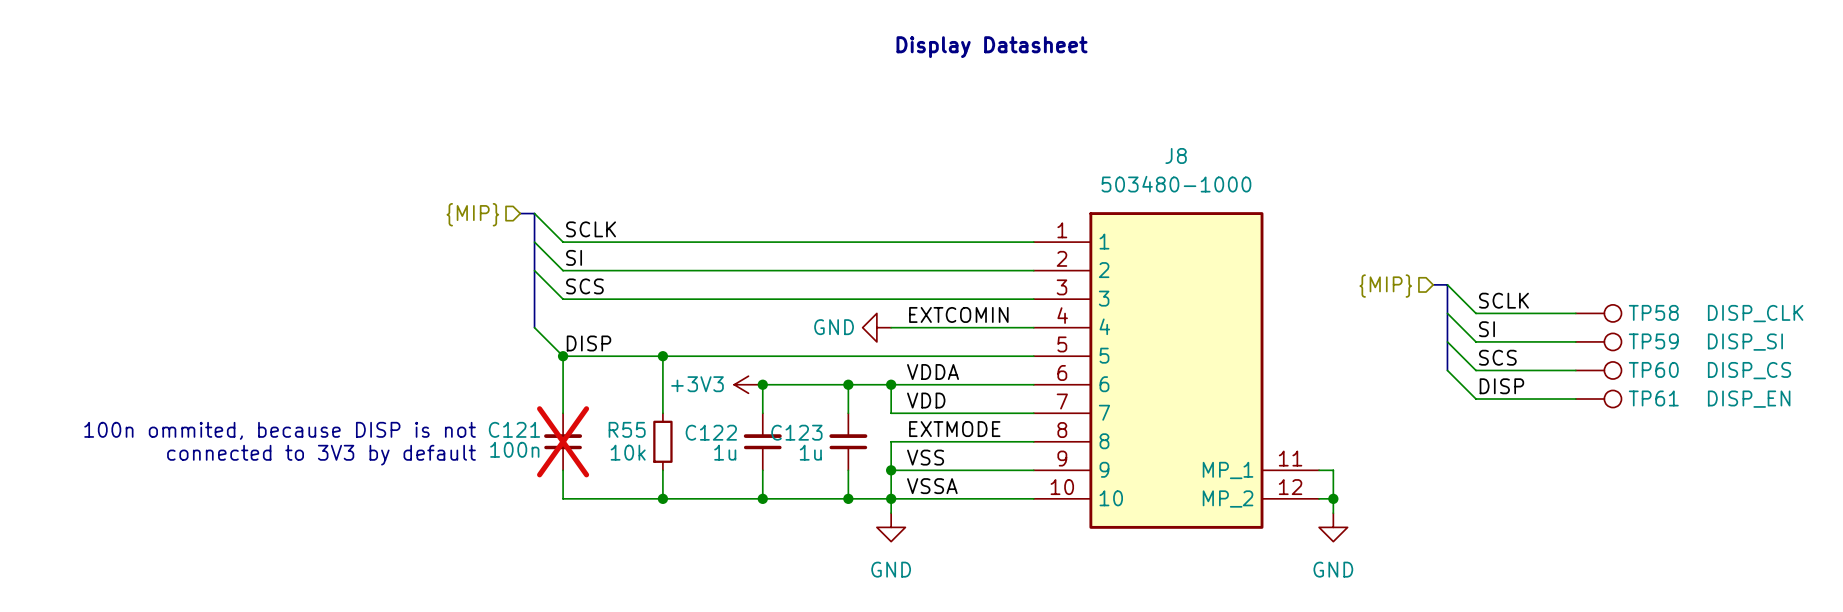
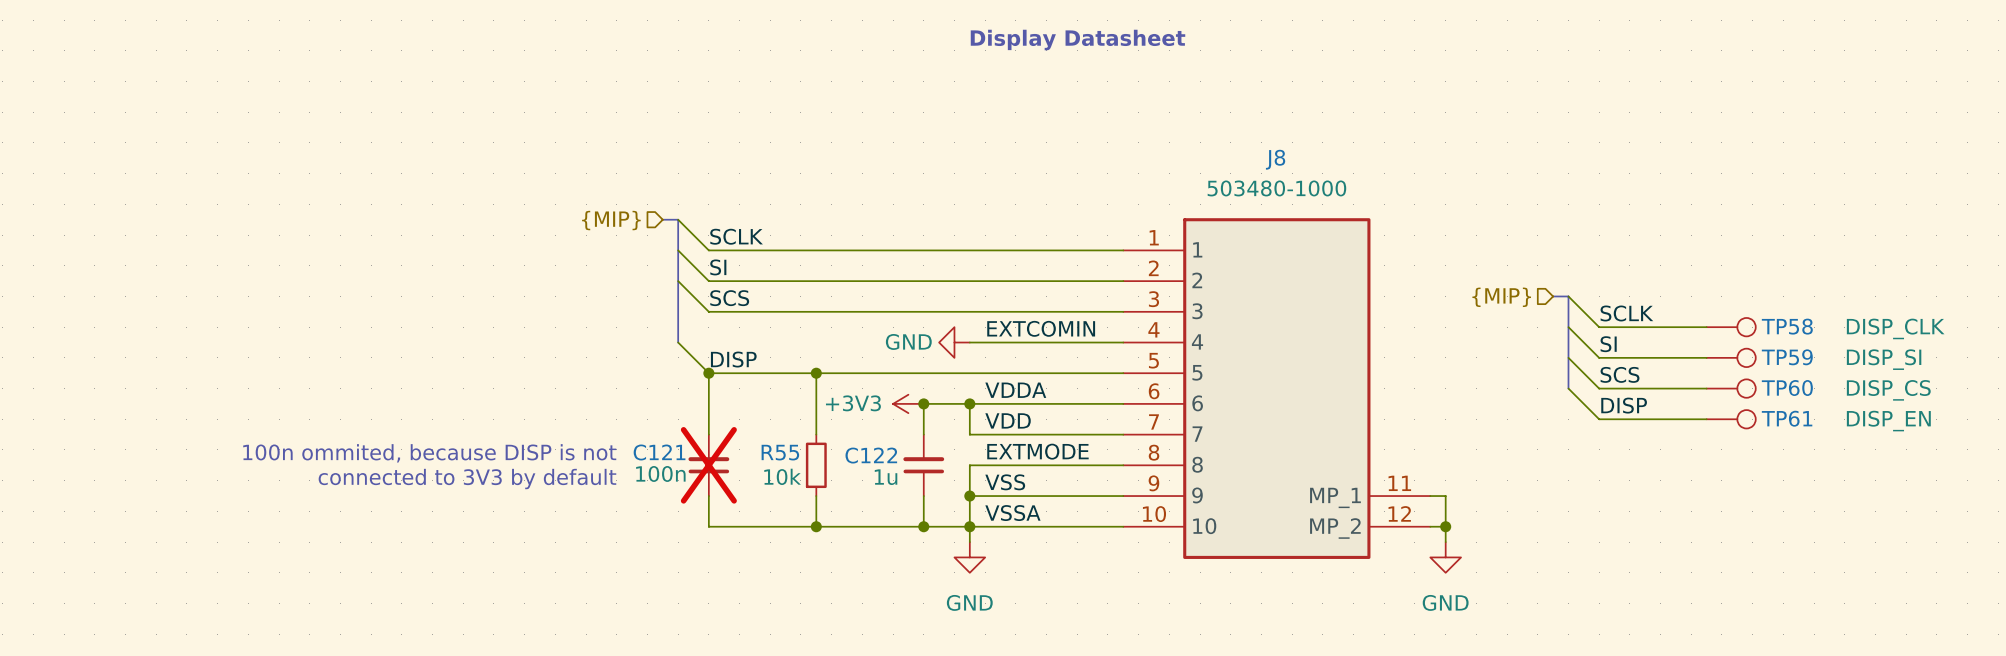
bus: (520, 213) (534, 213) (534, 327) -> (662, 219) (678, 219) (678, 342)
wire: (534, 213) (563, 242) (648, 242) -> (678, 219) (708, 250)
hierarchical label position: {MIP} (472, 214) -> {MIP} (611, 220)
label position: SCLK (591, 229) -> SCLK (736, 236)
wire: (534, 242) (563, 270) (648, 270) -> (678, 250) (708, 281)
label position: SI (574, 257) -> SI (718, 267)
wire: (534, 270) (563, 299) (648, 299) -> (678, 281) (708, 311)
label position: SCS (584, 286) -> SCS (729, 298)
wire: (534, 327) (563, 356) -> none
wire: none -> (678, 342) (708, 373) (708, 434)
label position: DISP (588, 343) -> DISP (733, 359)
wire: (563, 356) (648, 356) -> none
wire: (563, 356) (563, 413) -> none
junction: (563, 356) -> none
wire: (662, 356) (662, 413) -> (816, 373) (816, 434)
junction position: (662, 356) -> (708, 373)
power symbol position: +3V3 (748, 384) -> +3V3 (908, 403)
junction position: (762, 384) -> (816, 373)
wire: (848, 384) (762, 384) (762, 413) -> none
text position: 100n ommited, because DISP is not (280, 430) -> 100n ommited, because DISP is not (429, 453)
C123 name: C123 (796, 432) -> C122 (871, 455)
C121 position: (563, 441) -> (708, 465)
R55 position: (662, 441) -> (816, 465)
C122: 1u (762, 441) -> none
text position: connected to 3V3 by default (321, 455) -> connected to 3V3 by default (467, 479)
wire: (563, 470) (563, 498) (648, 498) -> (708, 496) (708, 526)
wire: (662, 470) (662, 498) -> none
wire: (762, 470) (762, 498) -> (816, 496) (816, 526)
junction: (662, 498) -> none
junction position: (762, 498) -> (816, 526)

